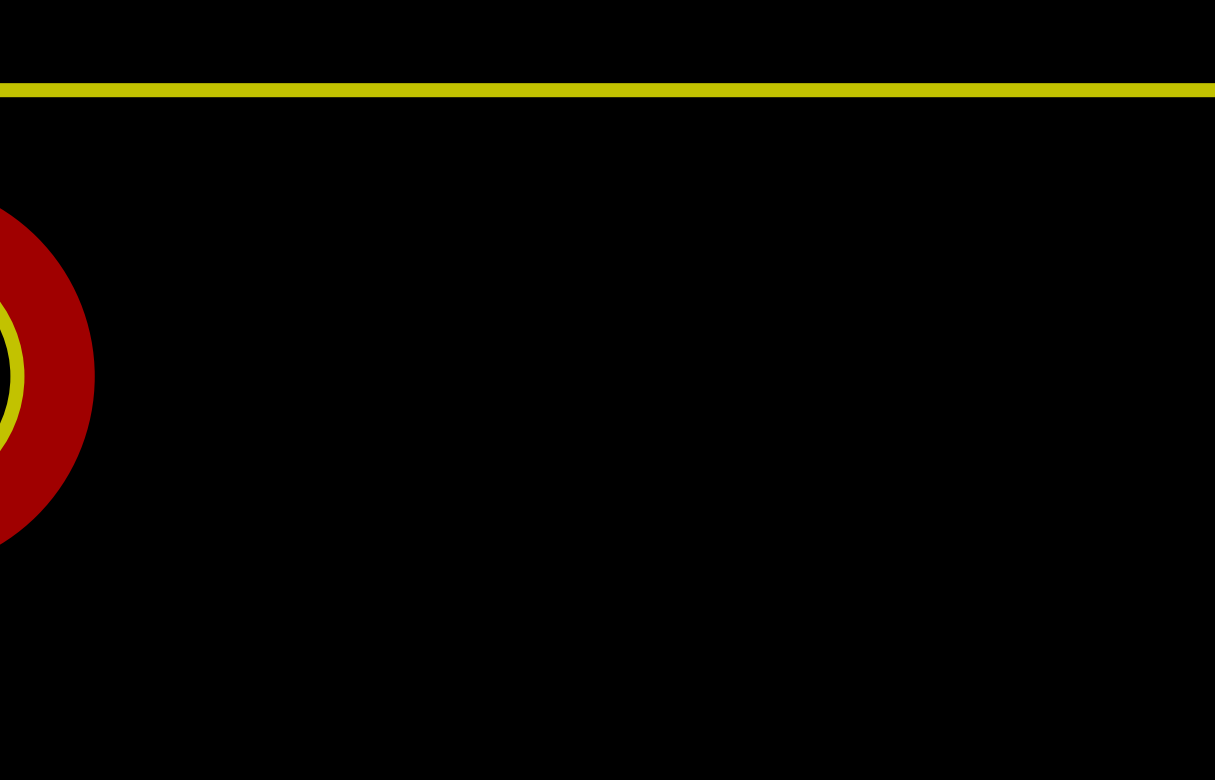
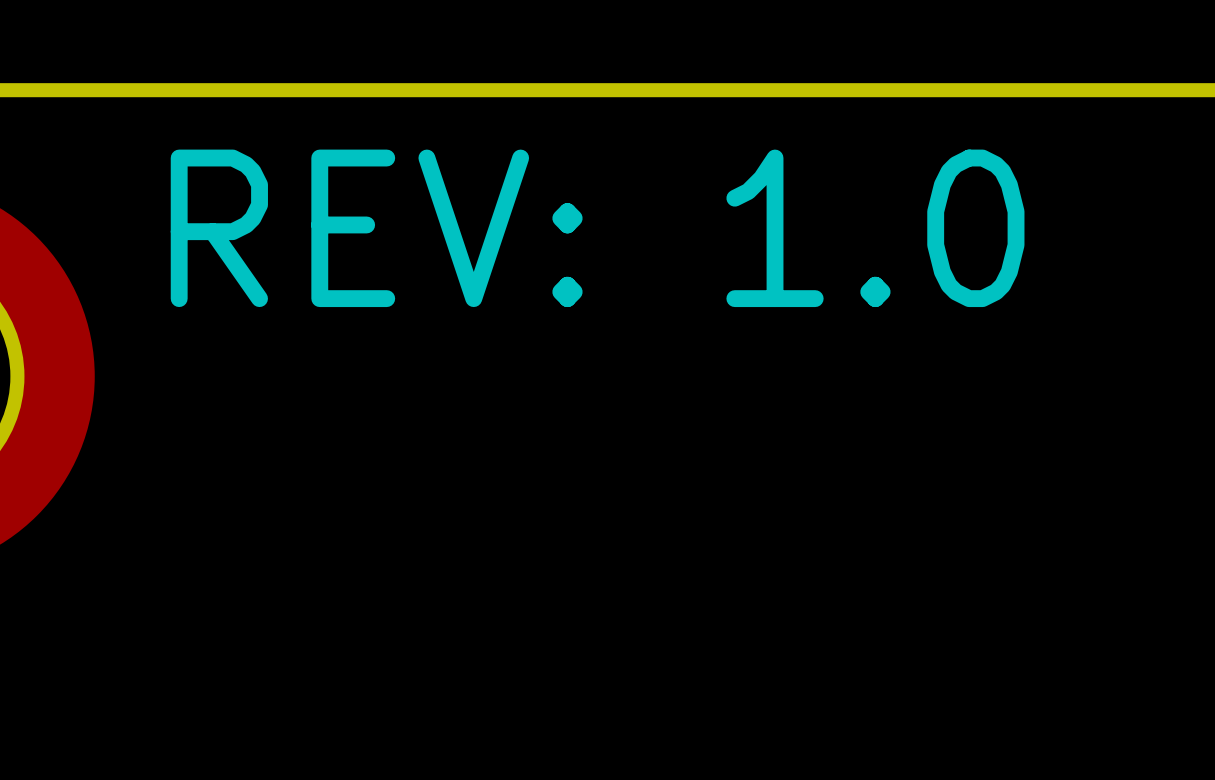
text: none -> REV: 1.0 (597, 228)

